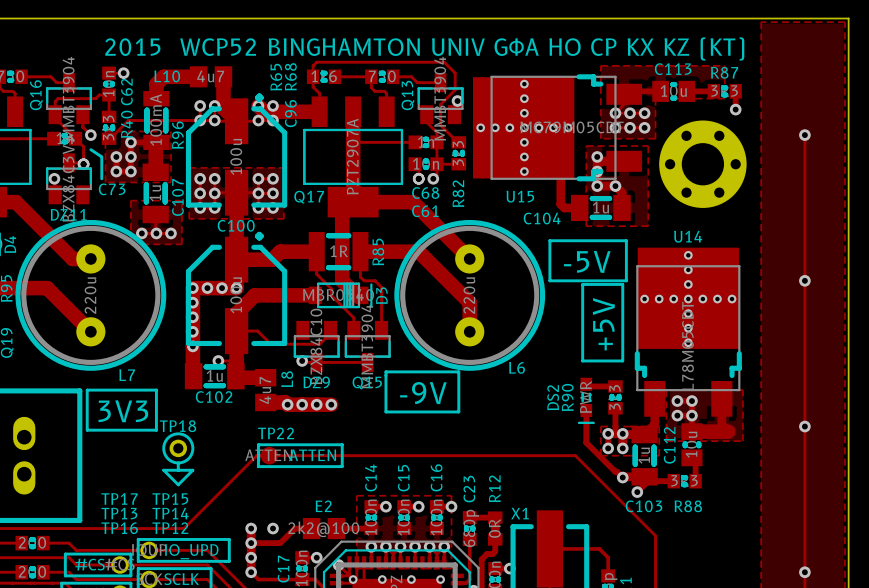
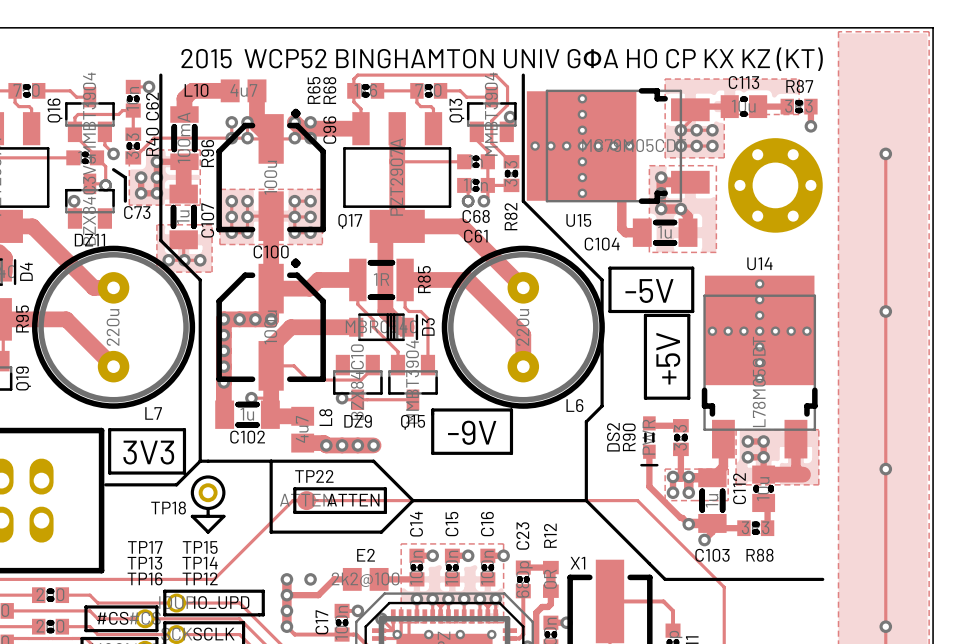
line: none -> (160, 75) (160, 240) (200, 279) (200, 461)
line: none -> (523, 75) (523, 201) (602, 279) (602, 406) (586, 421) (586, 500)
line: none -> (200, 461) (373, 461) (412, 500)
line: none -> (200, 461) (176, 484) (105, 484)
line: none -> (271, 461) (271, 532) (381, 532) (412, 500)
TP18 name position: TP18 (177, 426) -> TP18 (168, 507)
line: none -> (412, 500) (586, 500)
line: none -> (586, 500) (665, 579) (822, 579)

